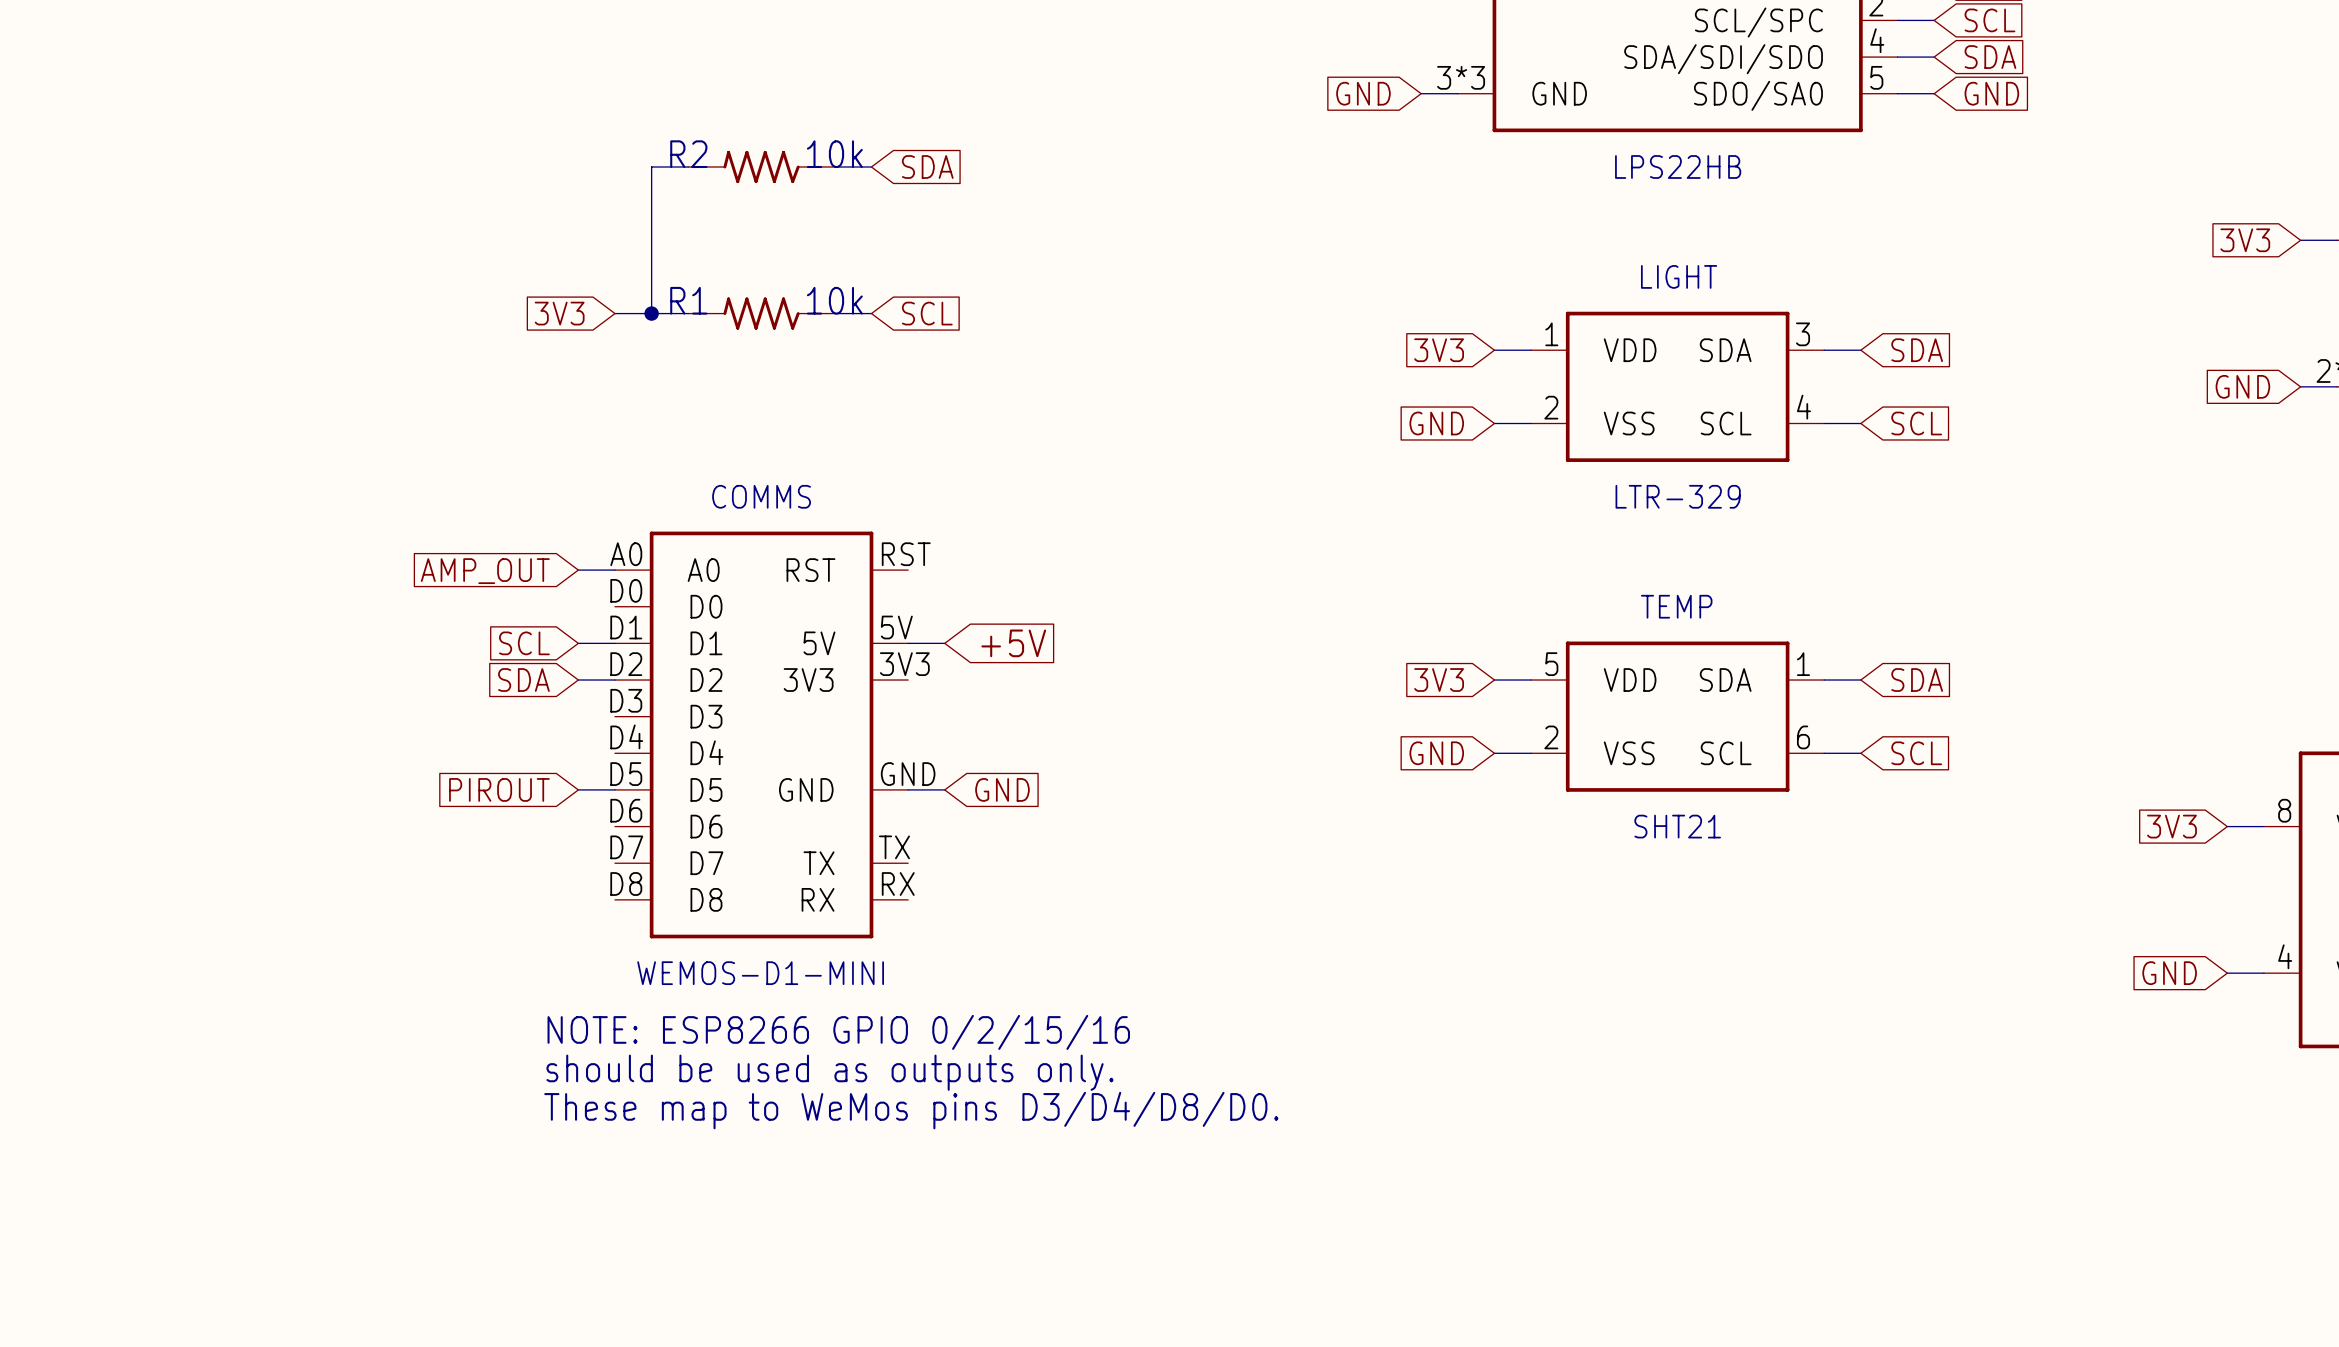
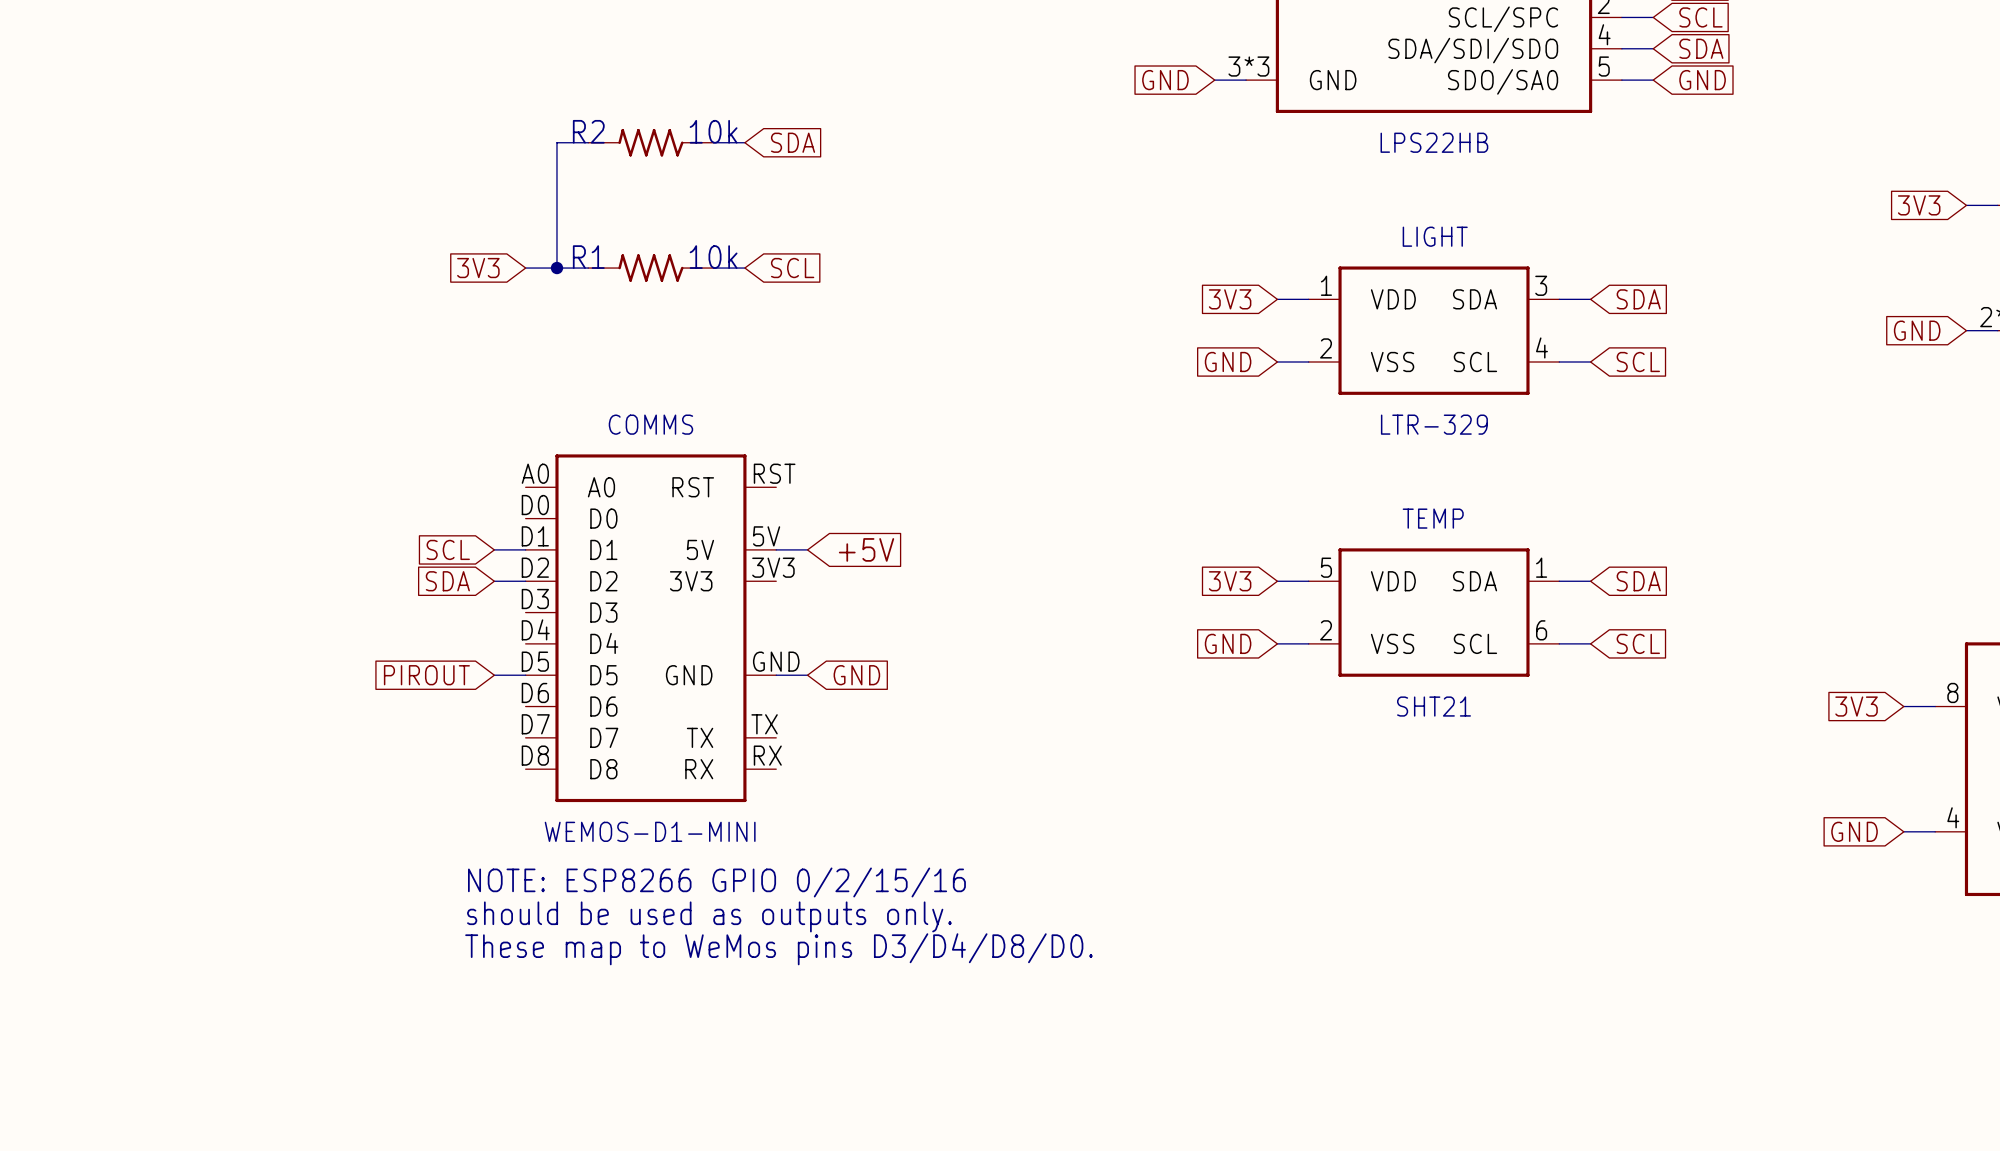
wire: (578, 570) (614, 570) -> none
global label: AMP_OUT (485, 571) -> none

